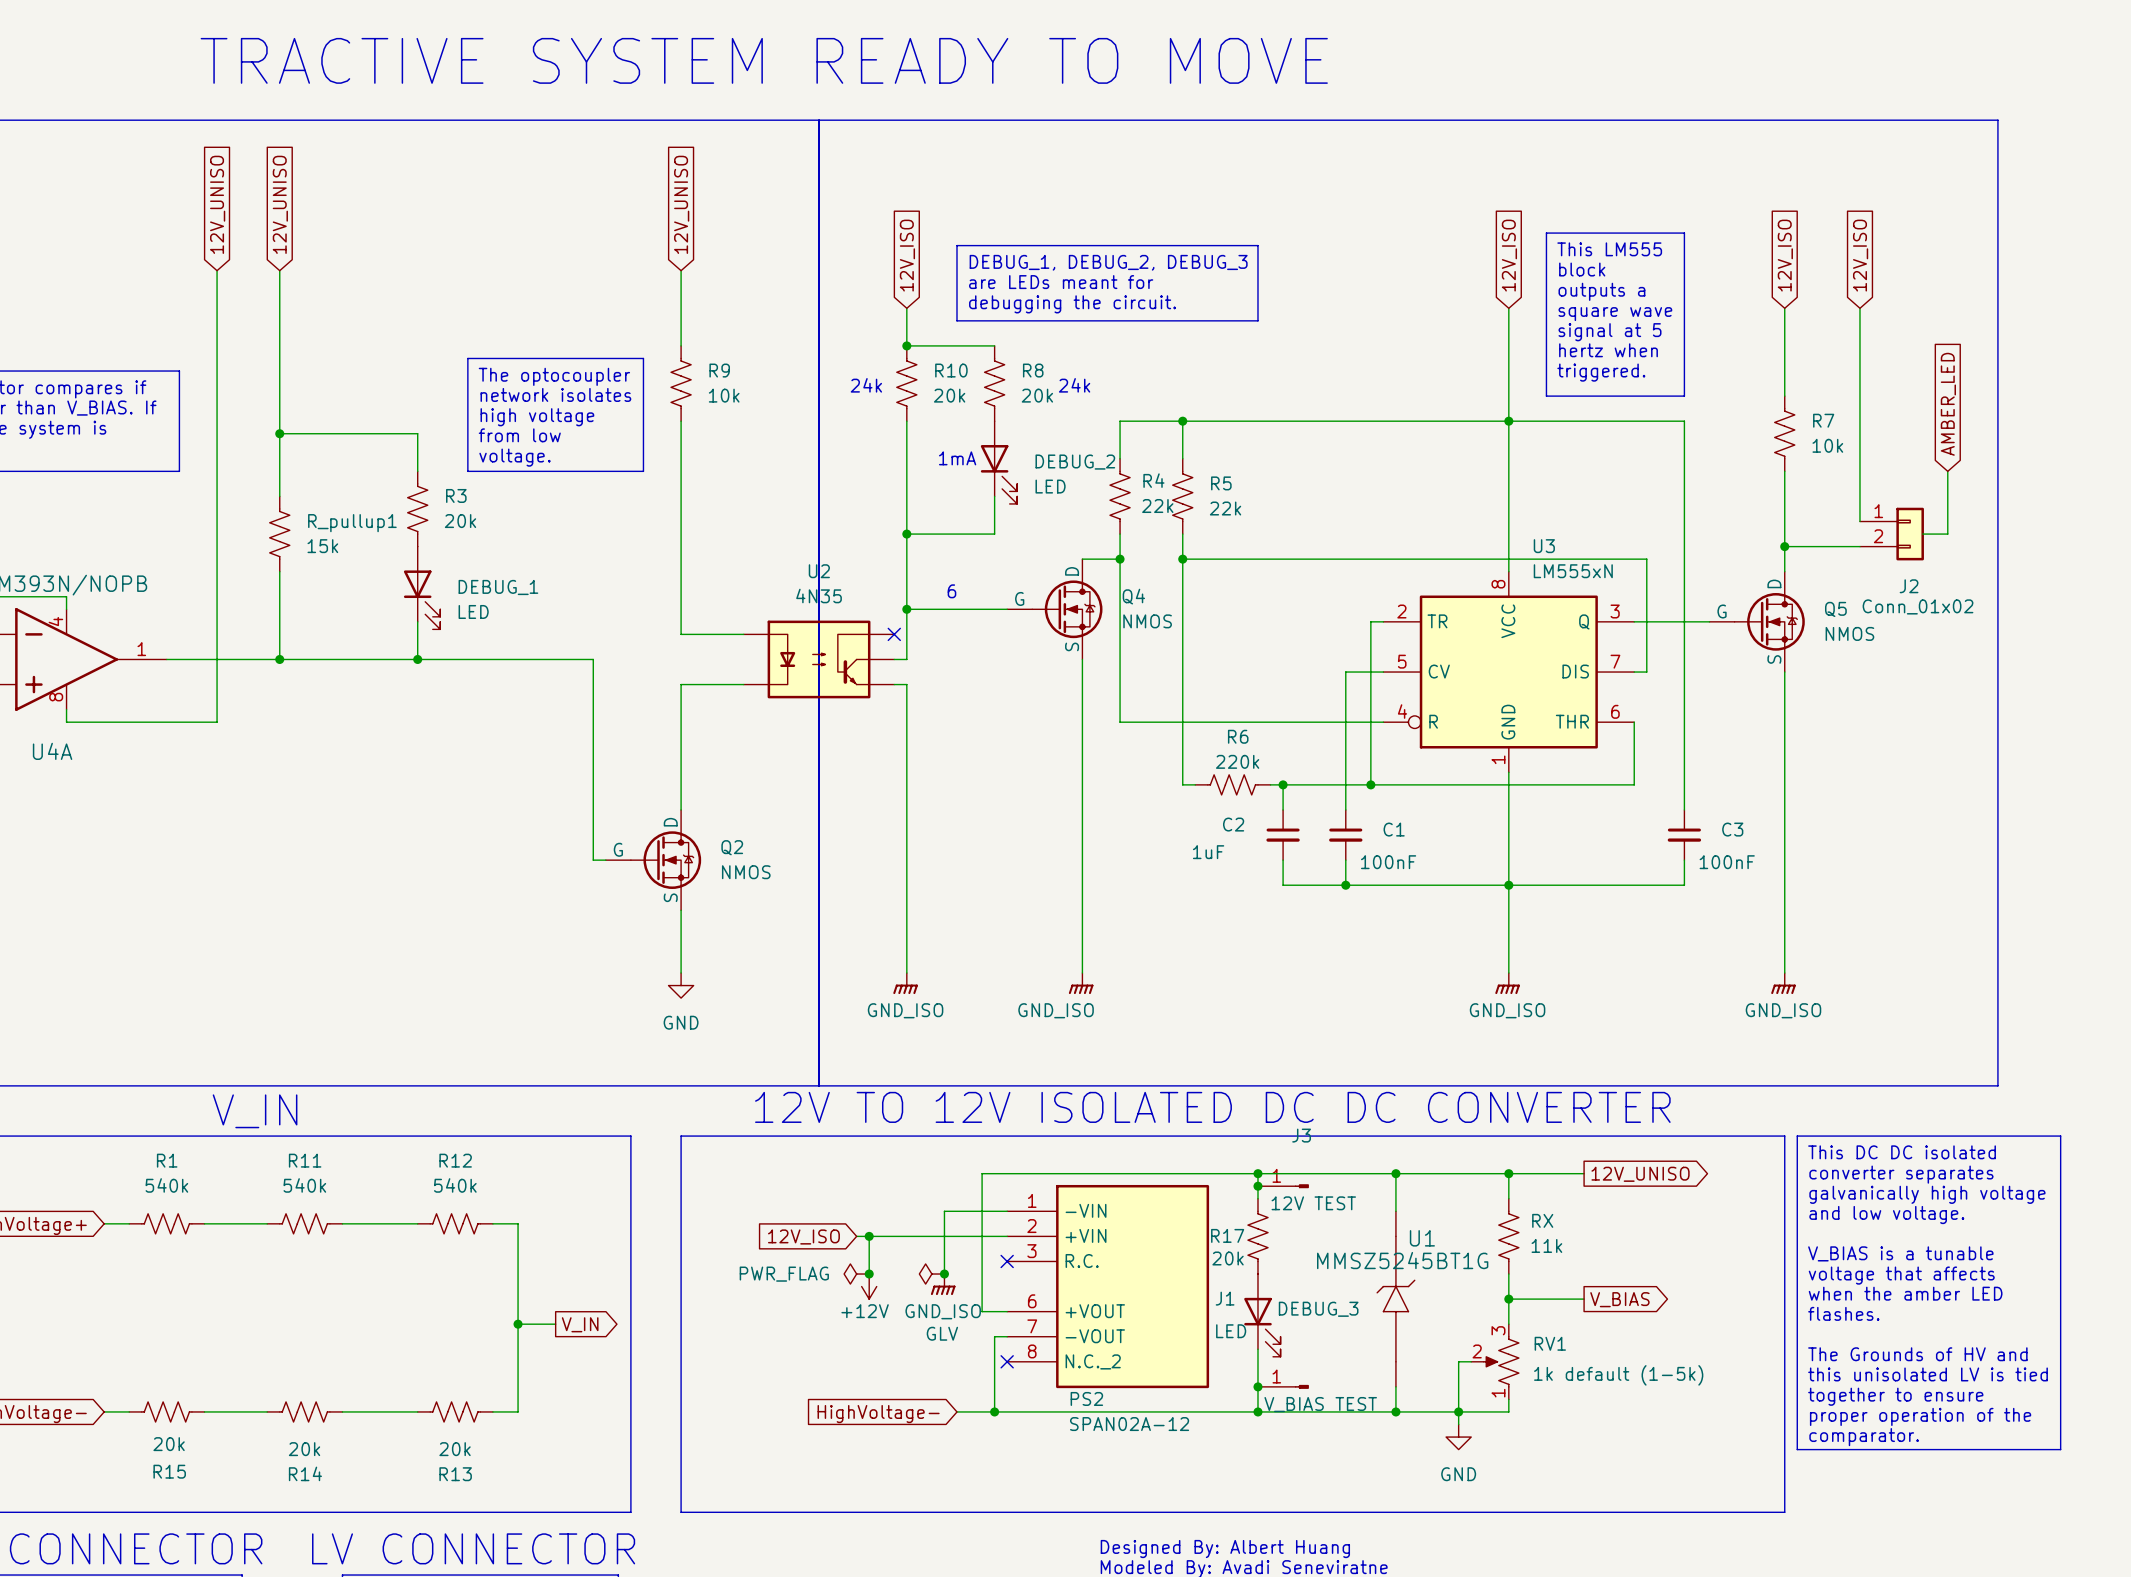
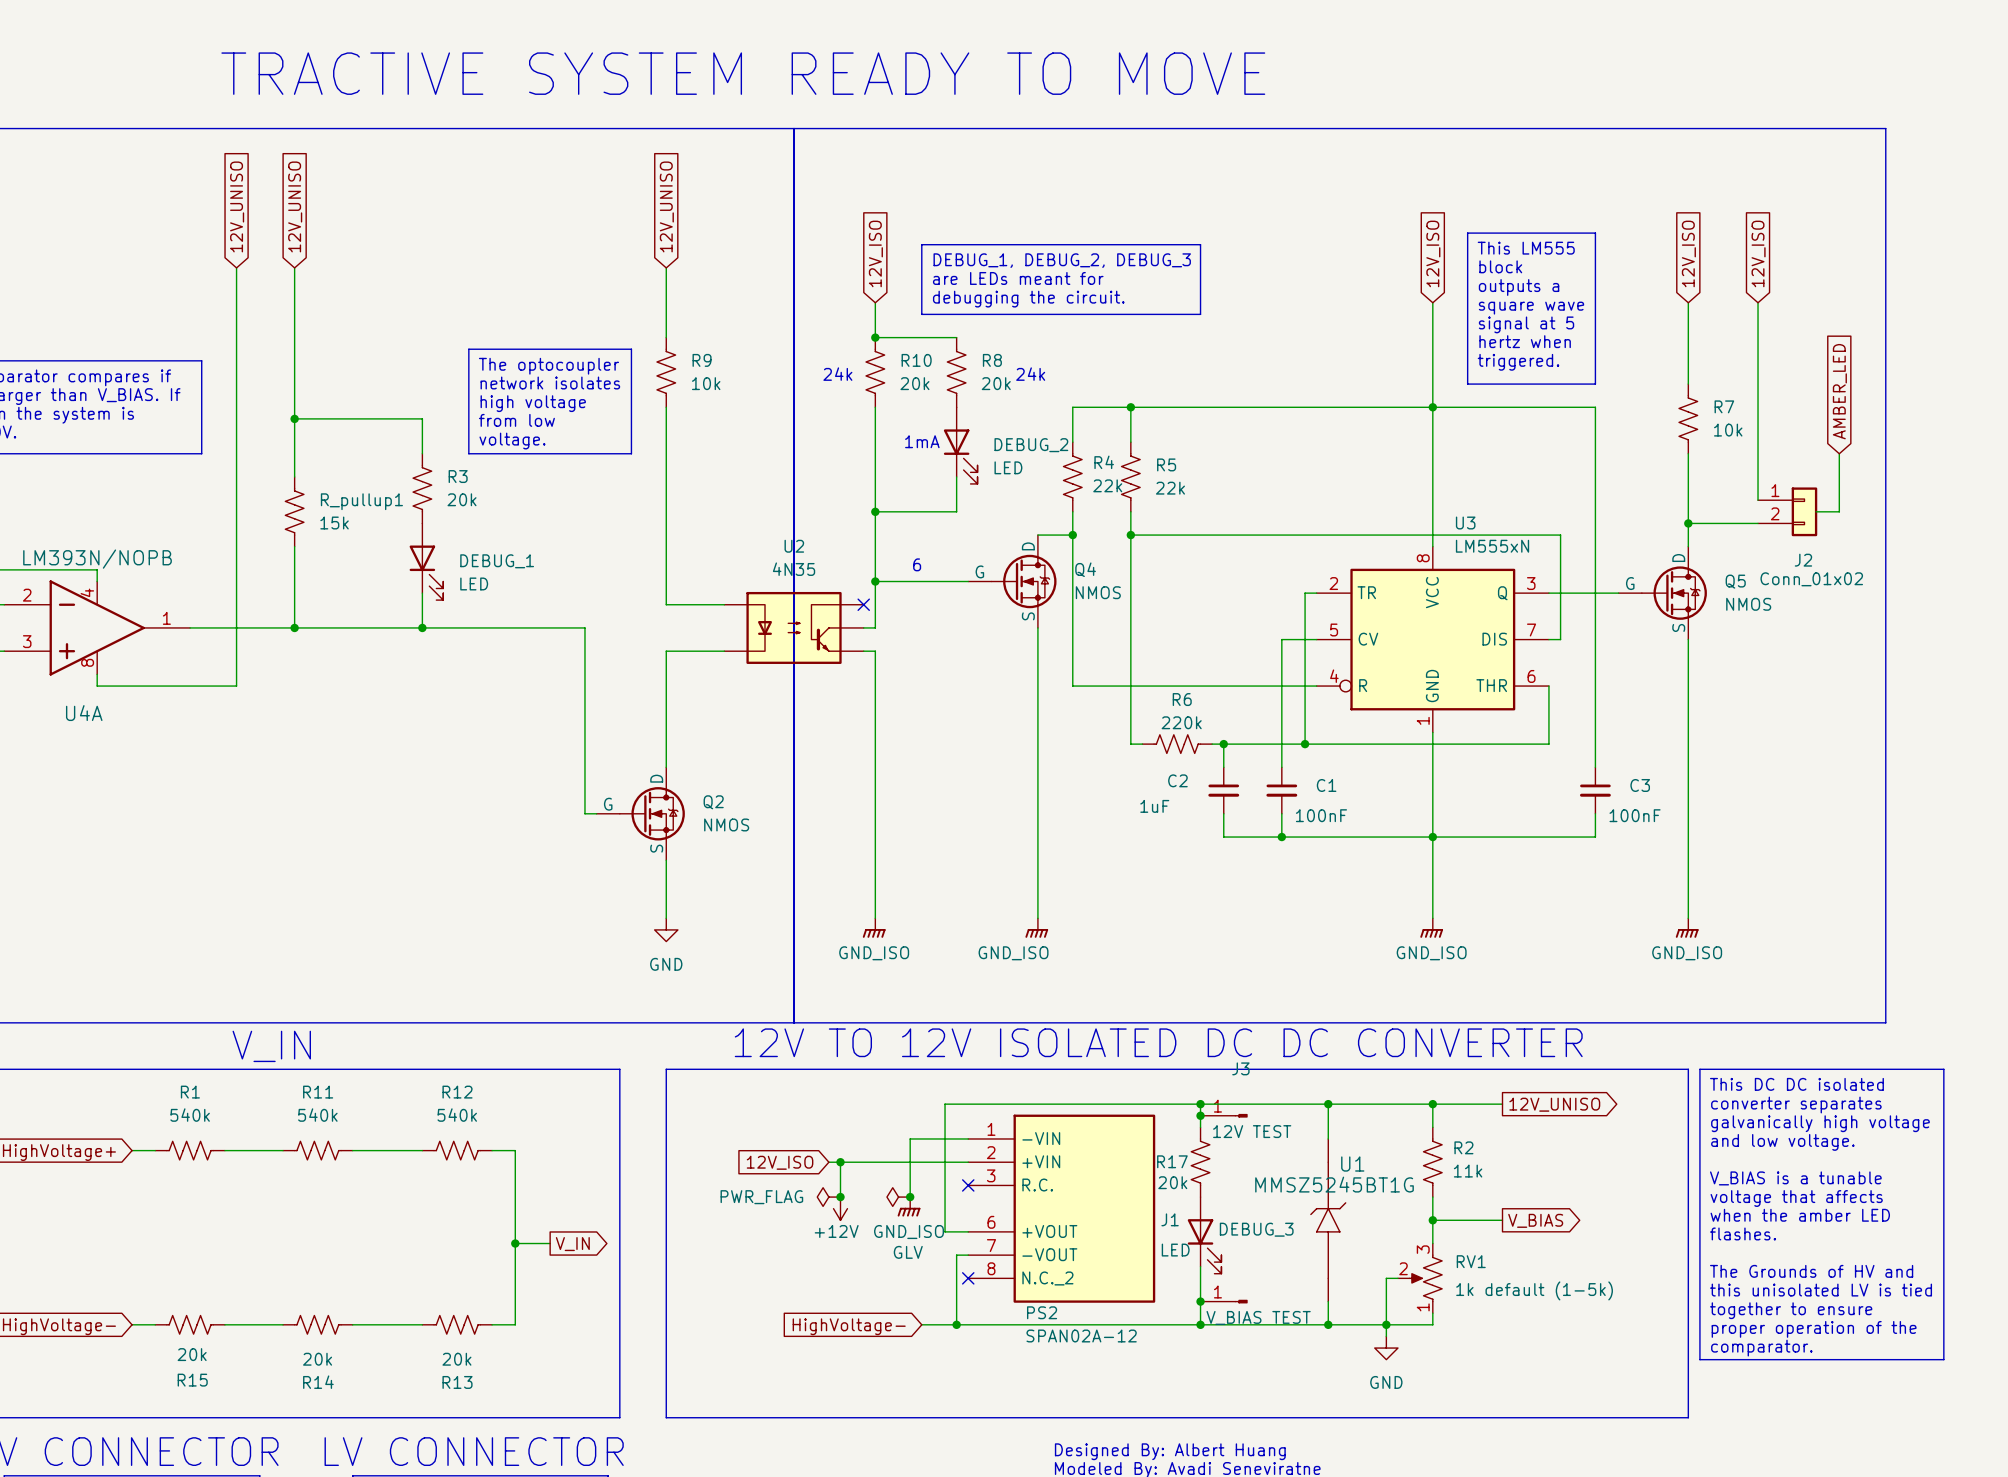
RX name: RX (1542, 1220) -> R2 (1463, 1147)

